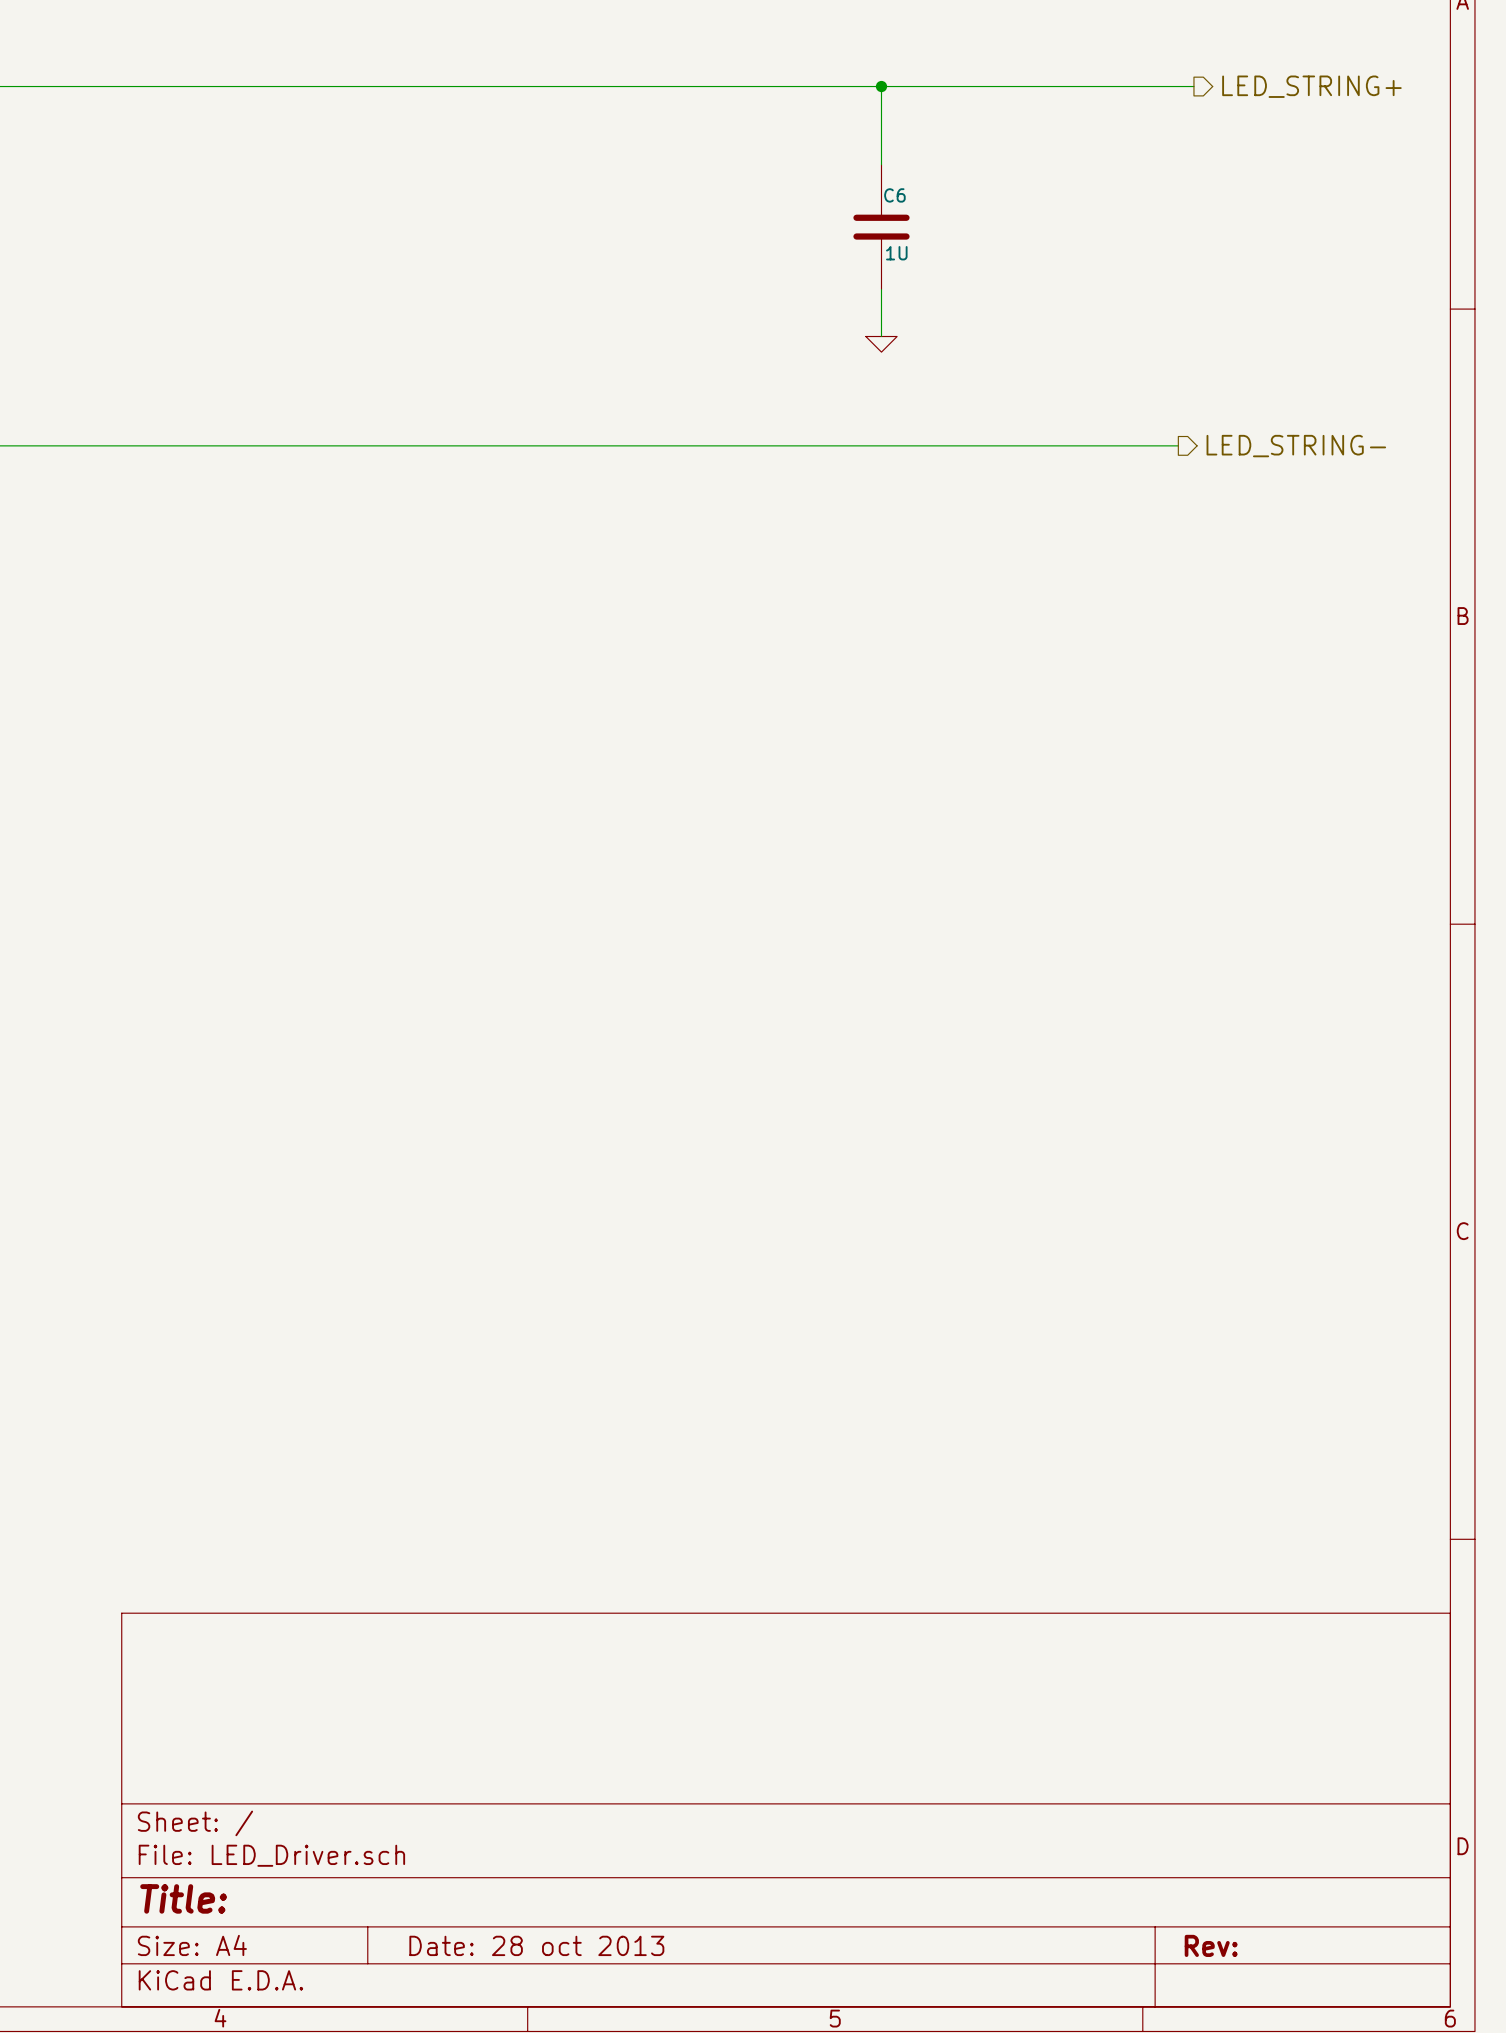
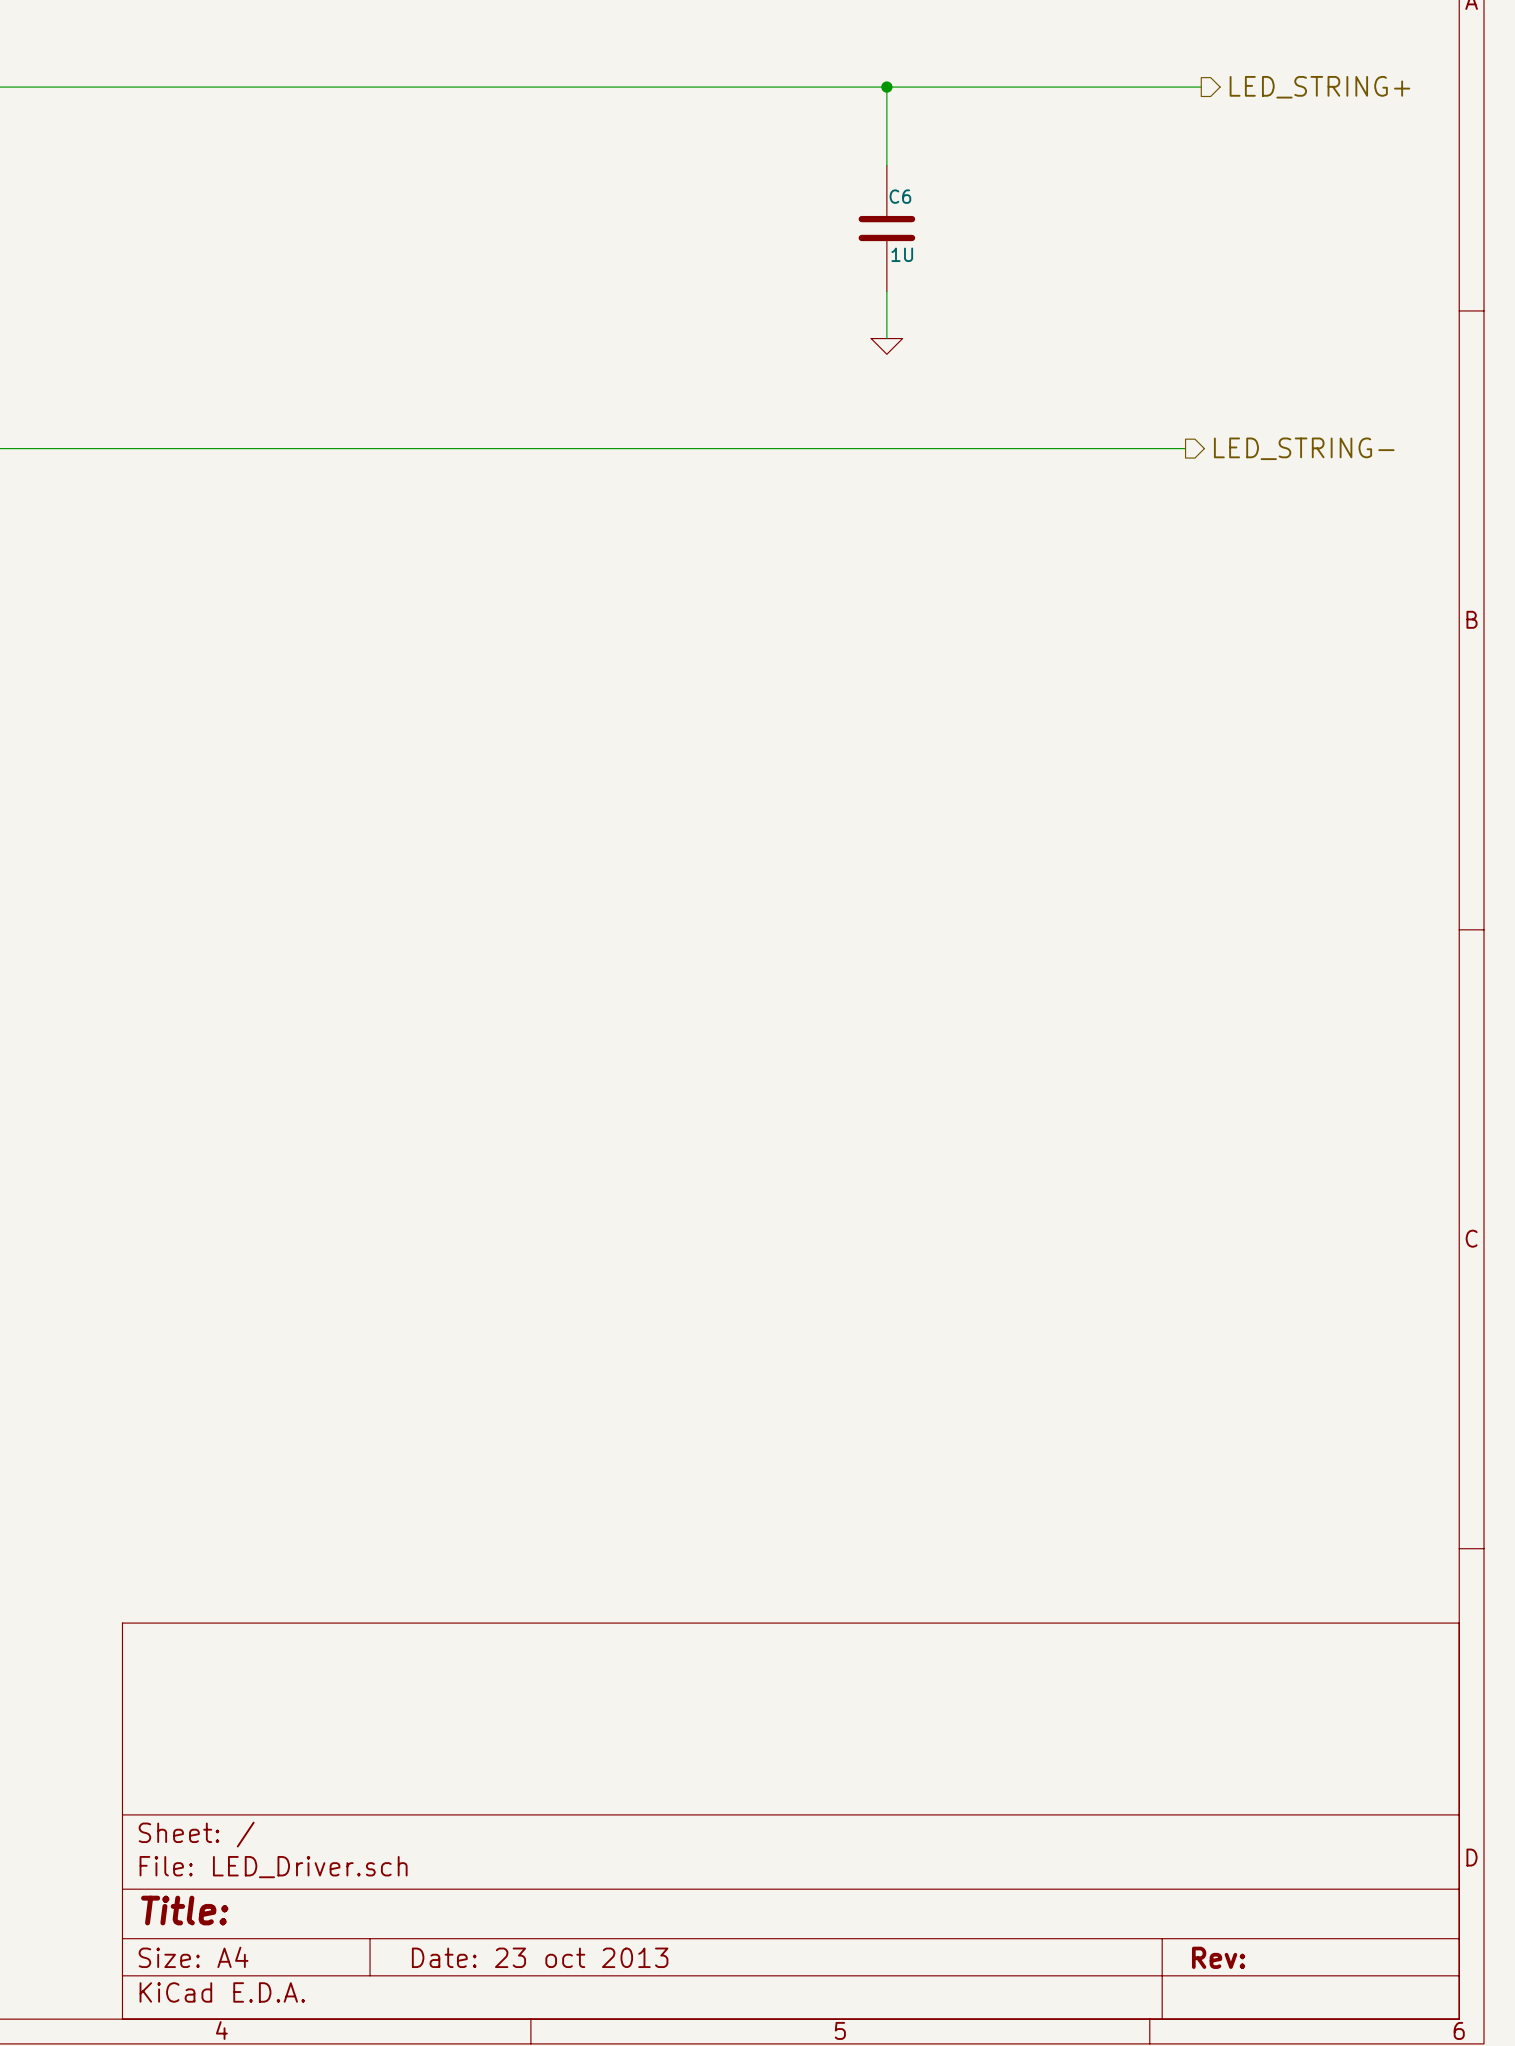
title block: Date: 28 oct 2013 (536, 1945) -> Date: 23 oct 2013 (540, 1957)

